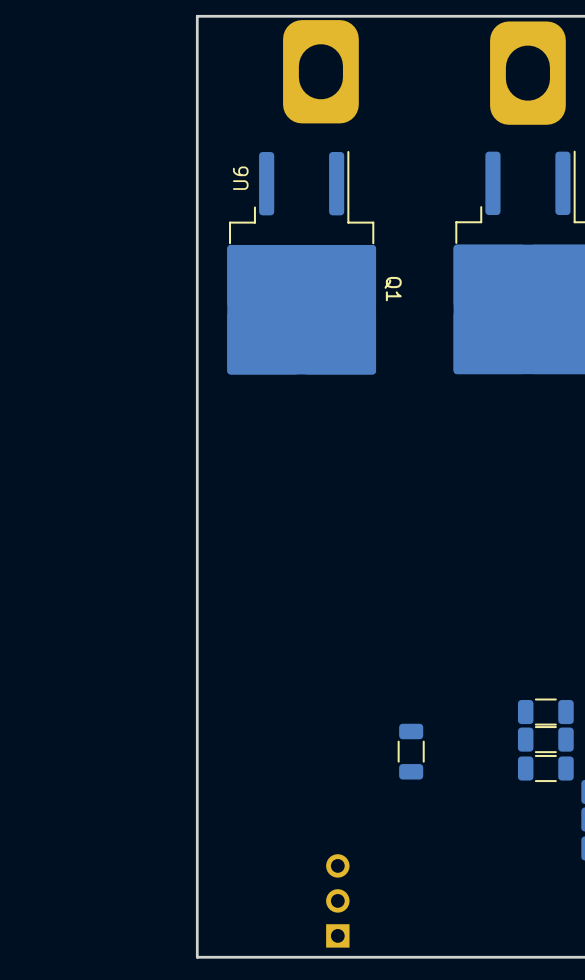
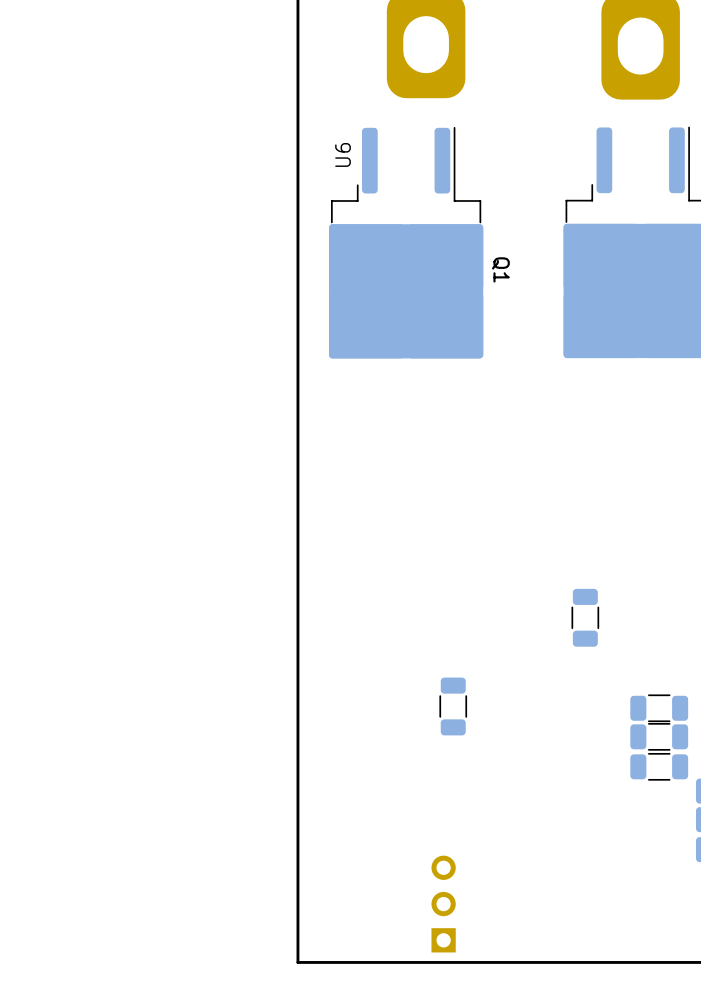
part: none -> (585, 617)
part: none -> (453, 706)
part: (411, 751) -> none

